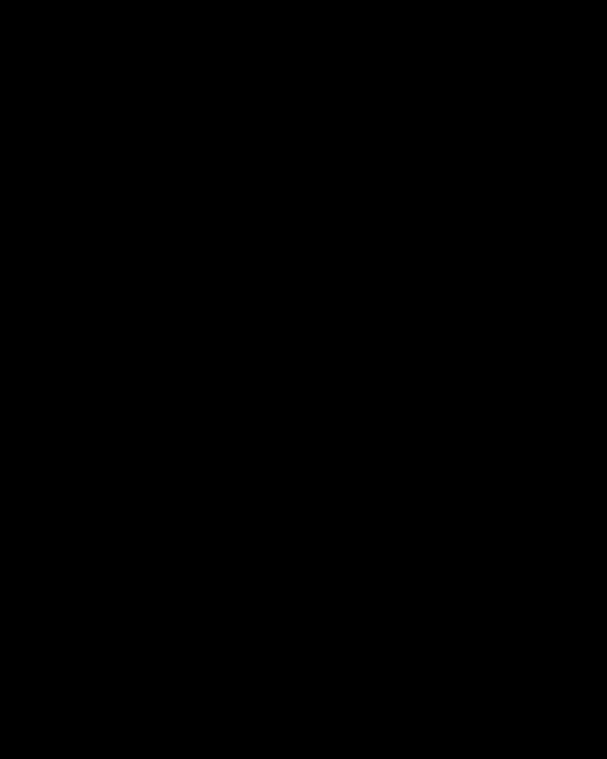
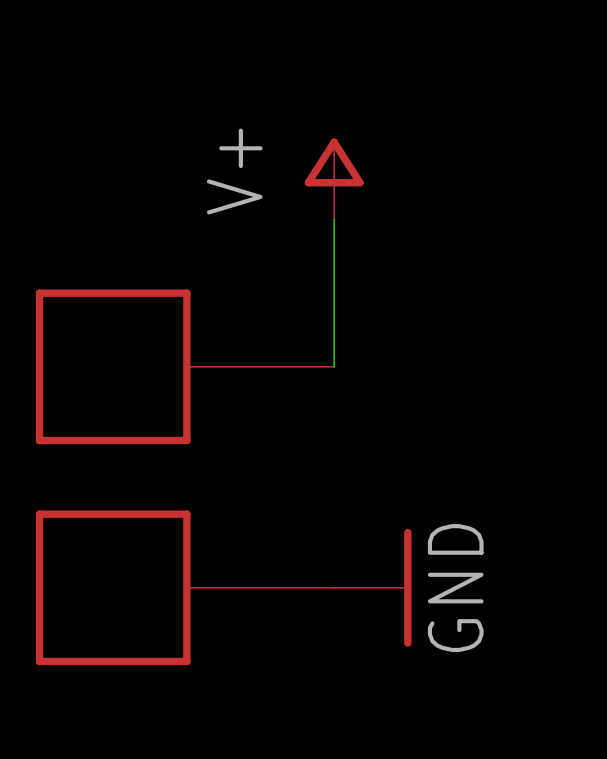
power symbol: none -> V+ (334, 179)
wire: none -> (334, 219) (334, 366)
part: none -> (185, 366)
part: none -> (185, 587)
power symbol: none -> GND (372, 587)

